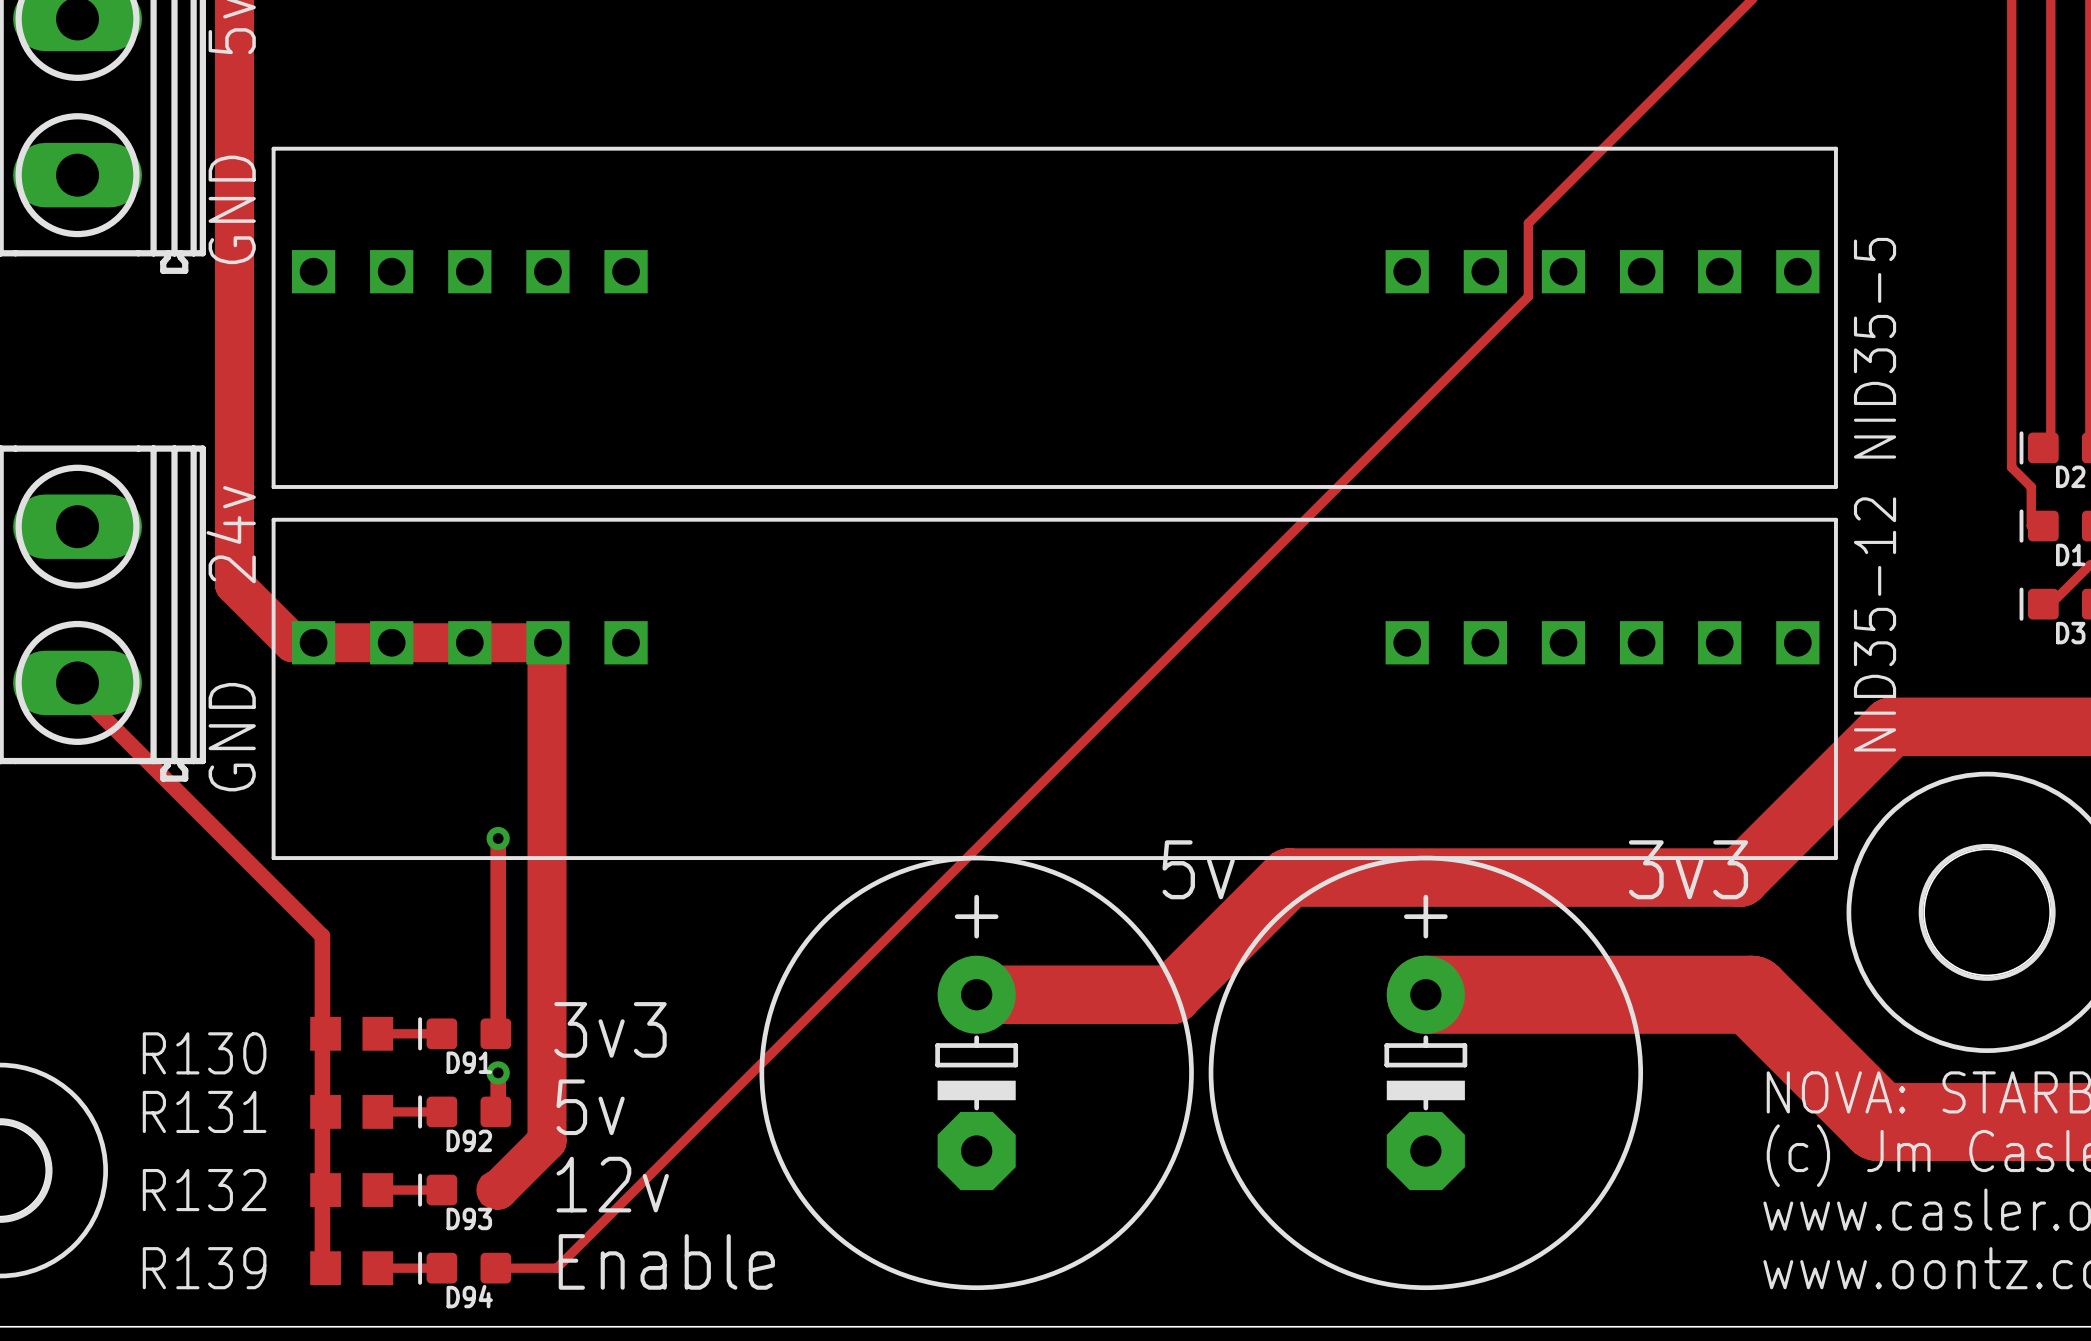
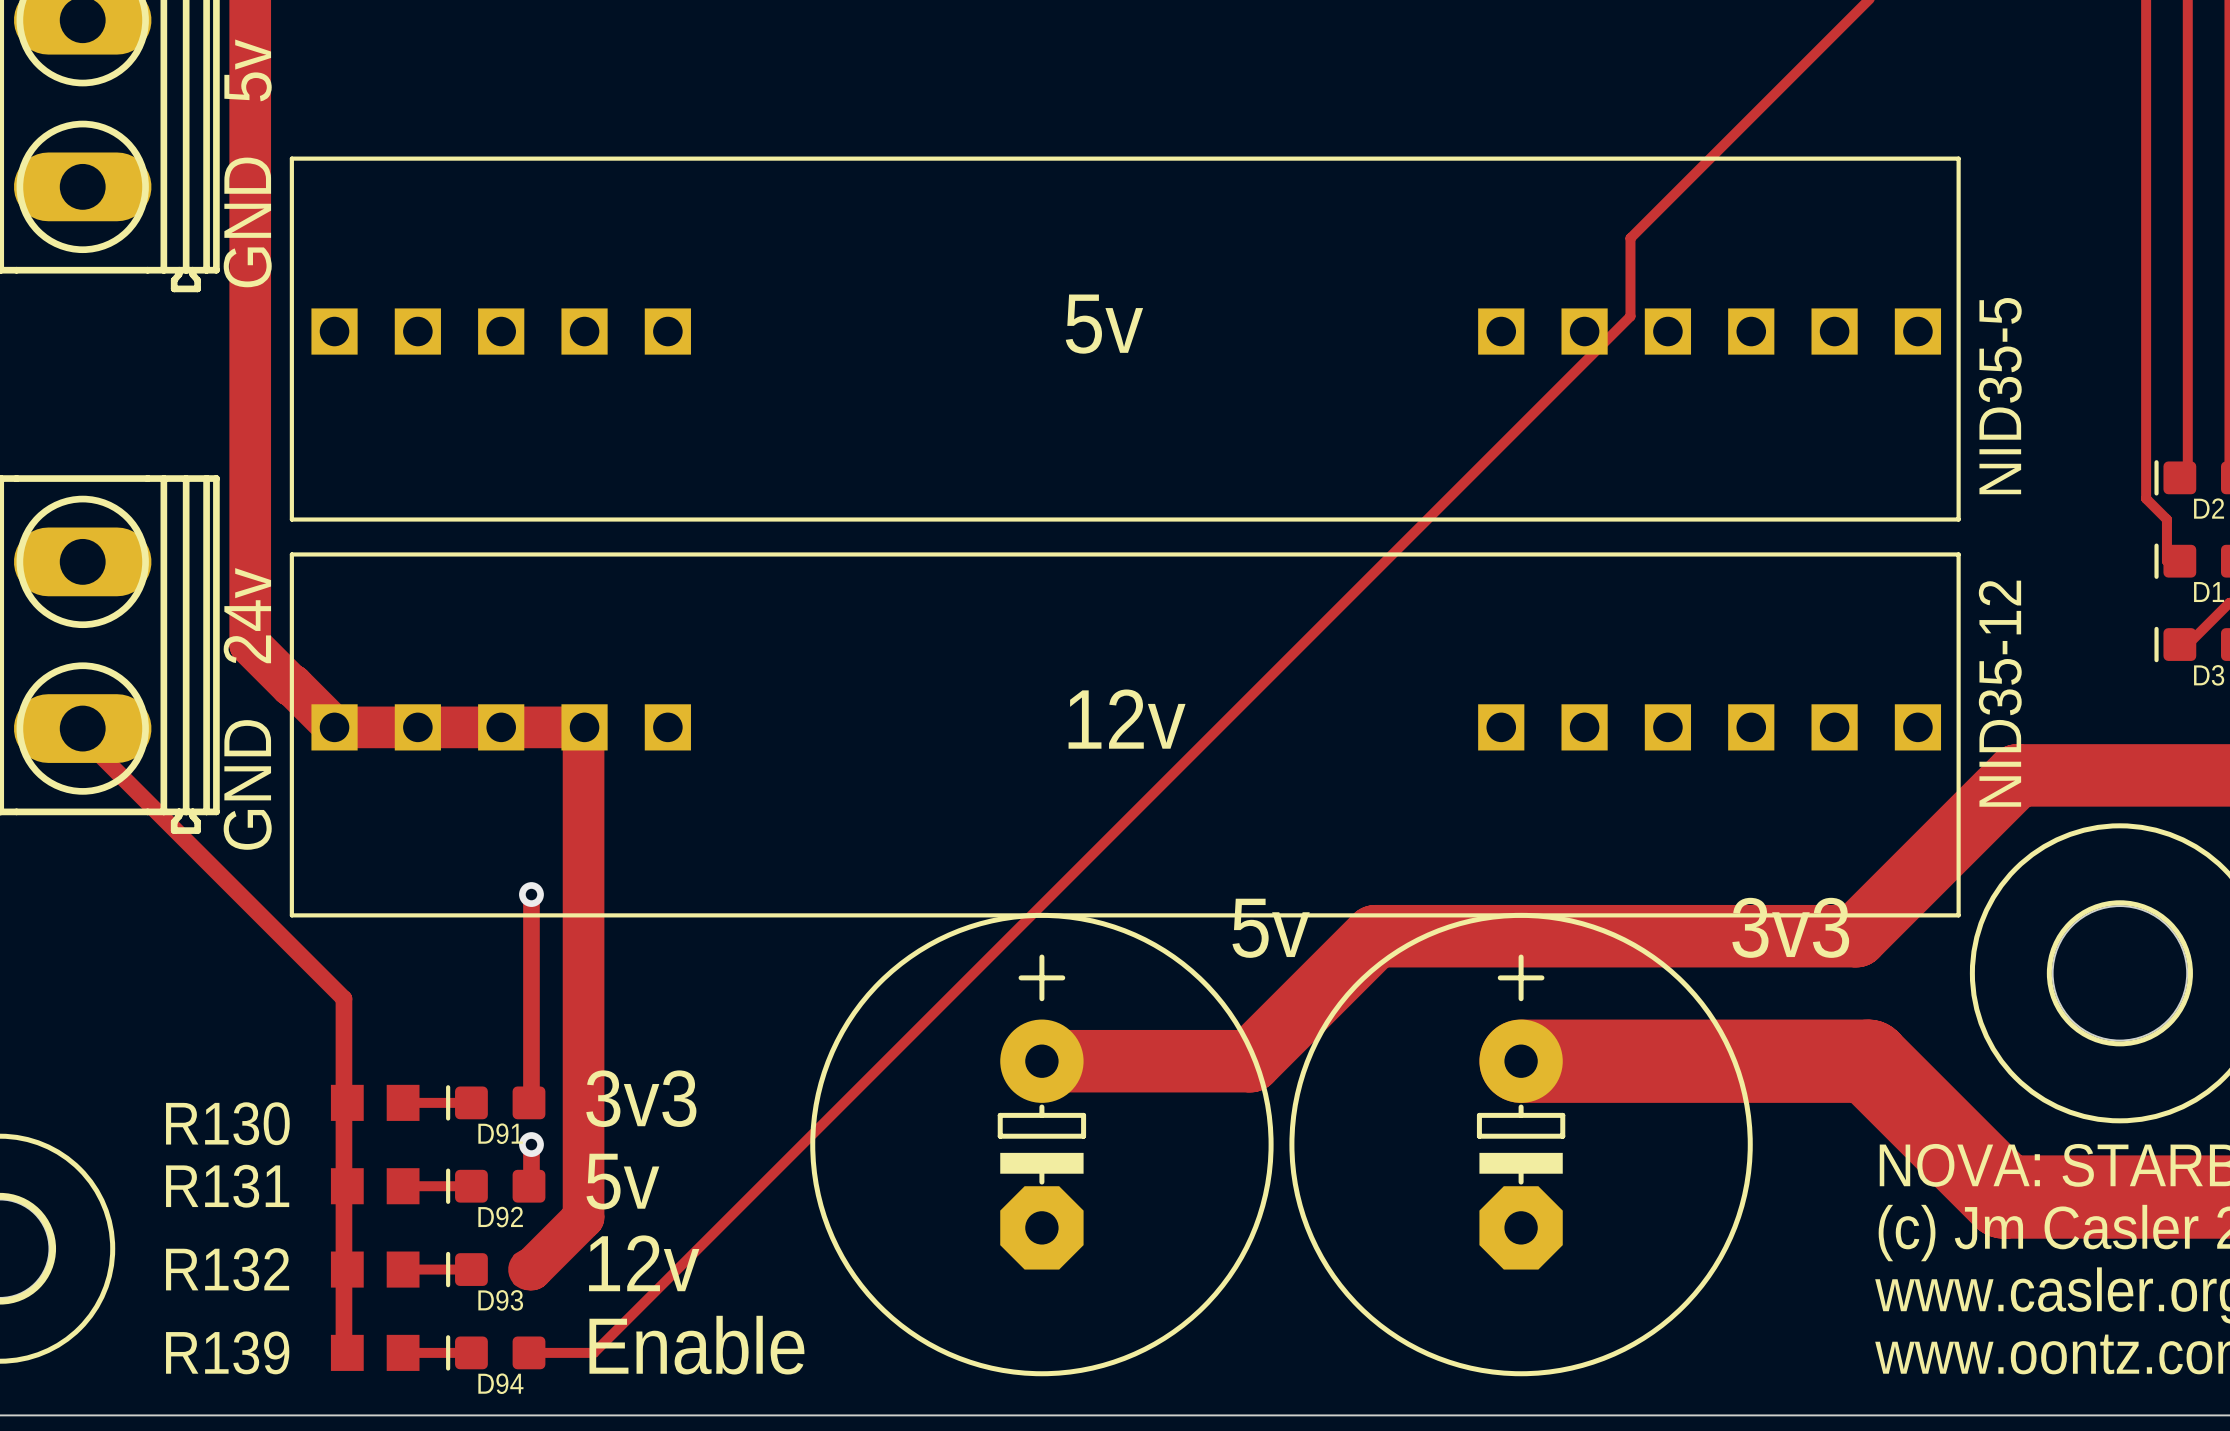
NID35-5 footprint: [271, 146, 1838, 489] -> [289, 156, 1961, 522]
text: none -> 5v (1104, 324)
NID35-12 footprint: [271, 517, 1838, 861] -> [289, 552, 1961, 918]
track: (234, 584) (292, 642) (547, 642) (547, 682) -> (250, 623) (250, 644) (334, 727) (583, 728)
text: none -> 12v (1127, 719)

